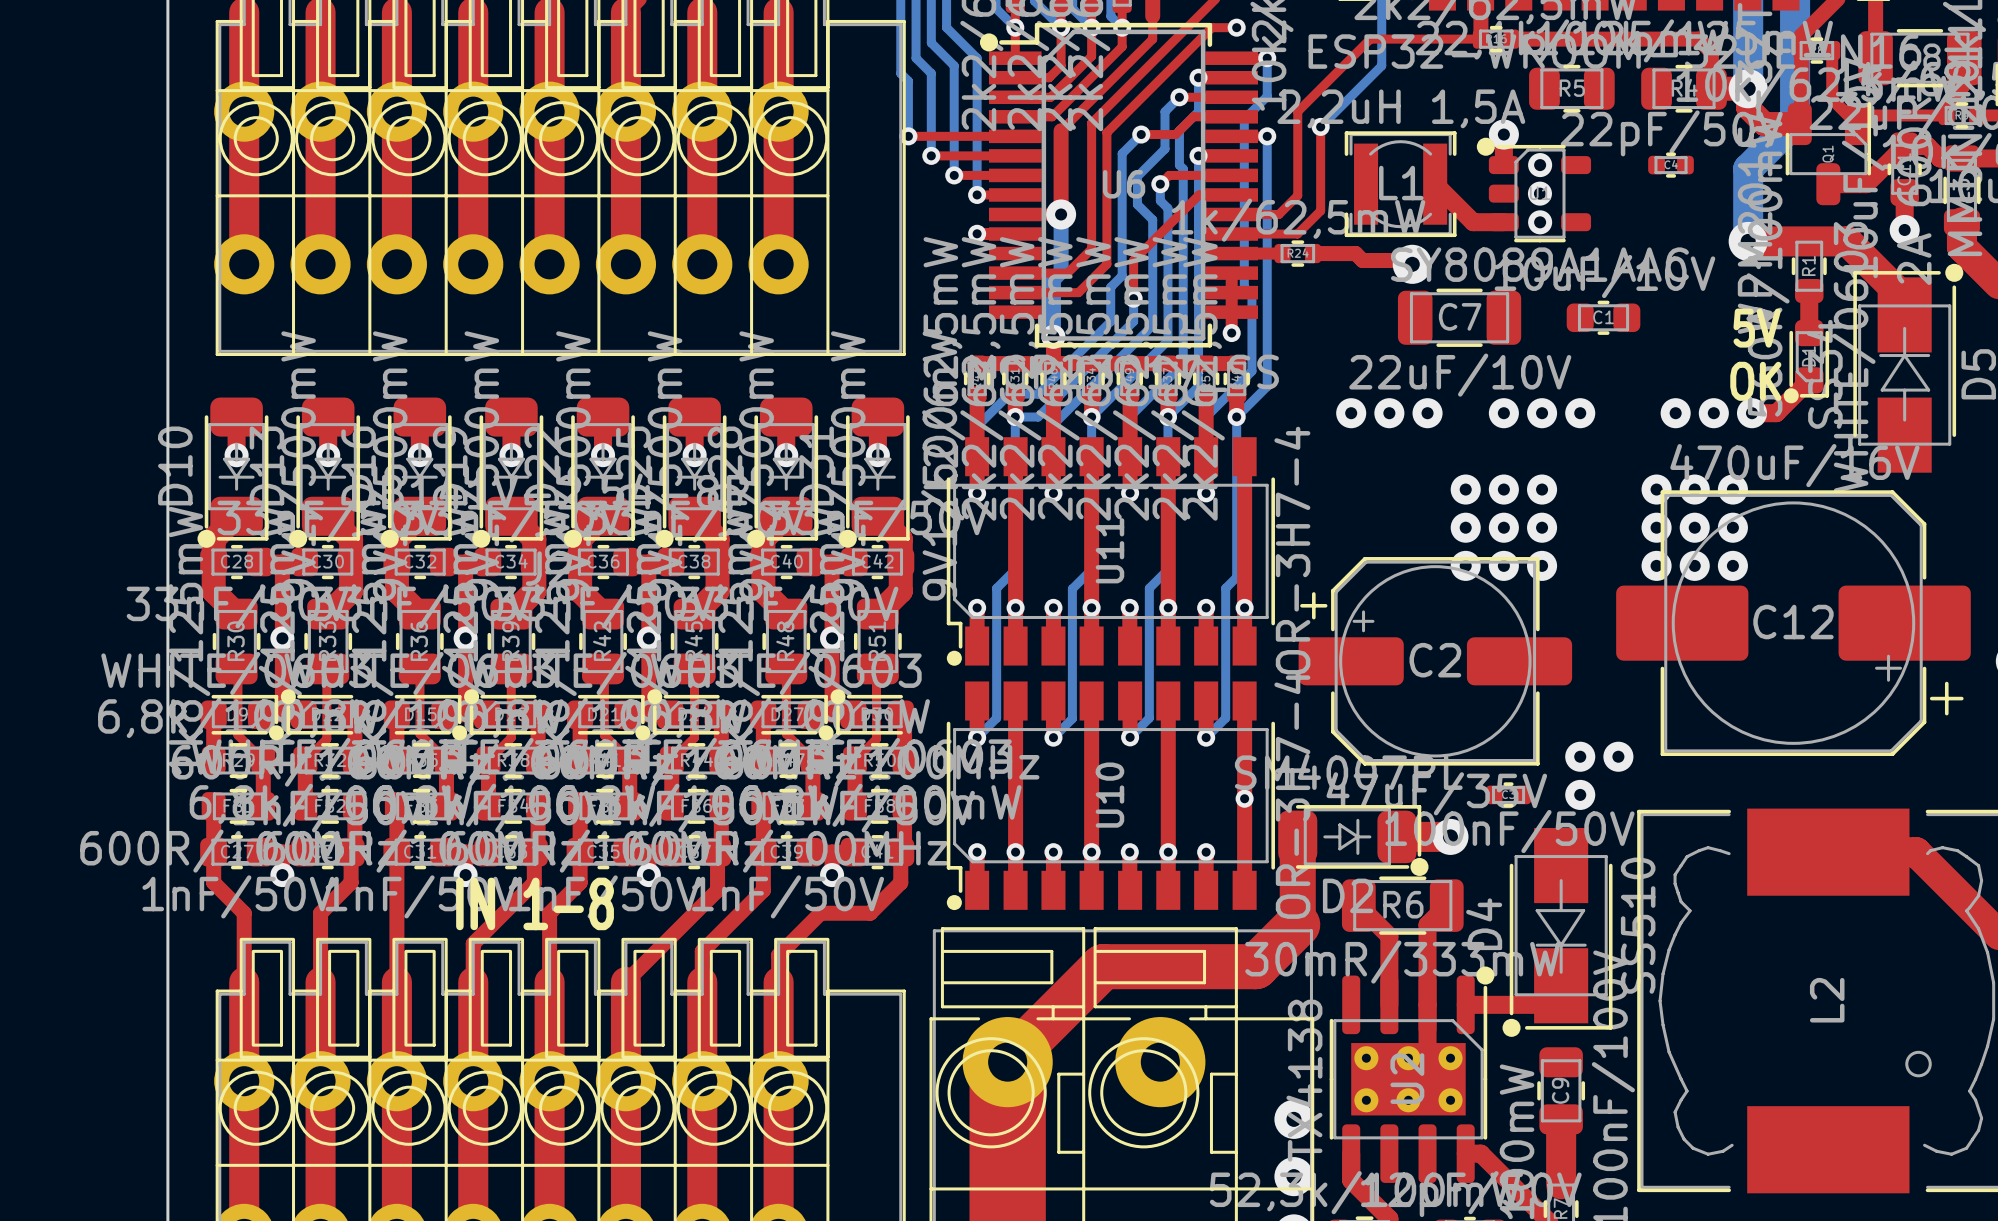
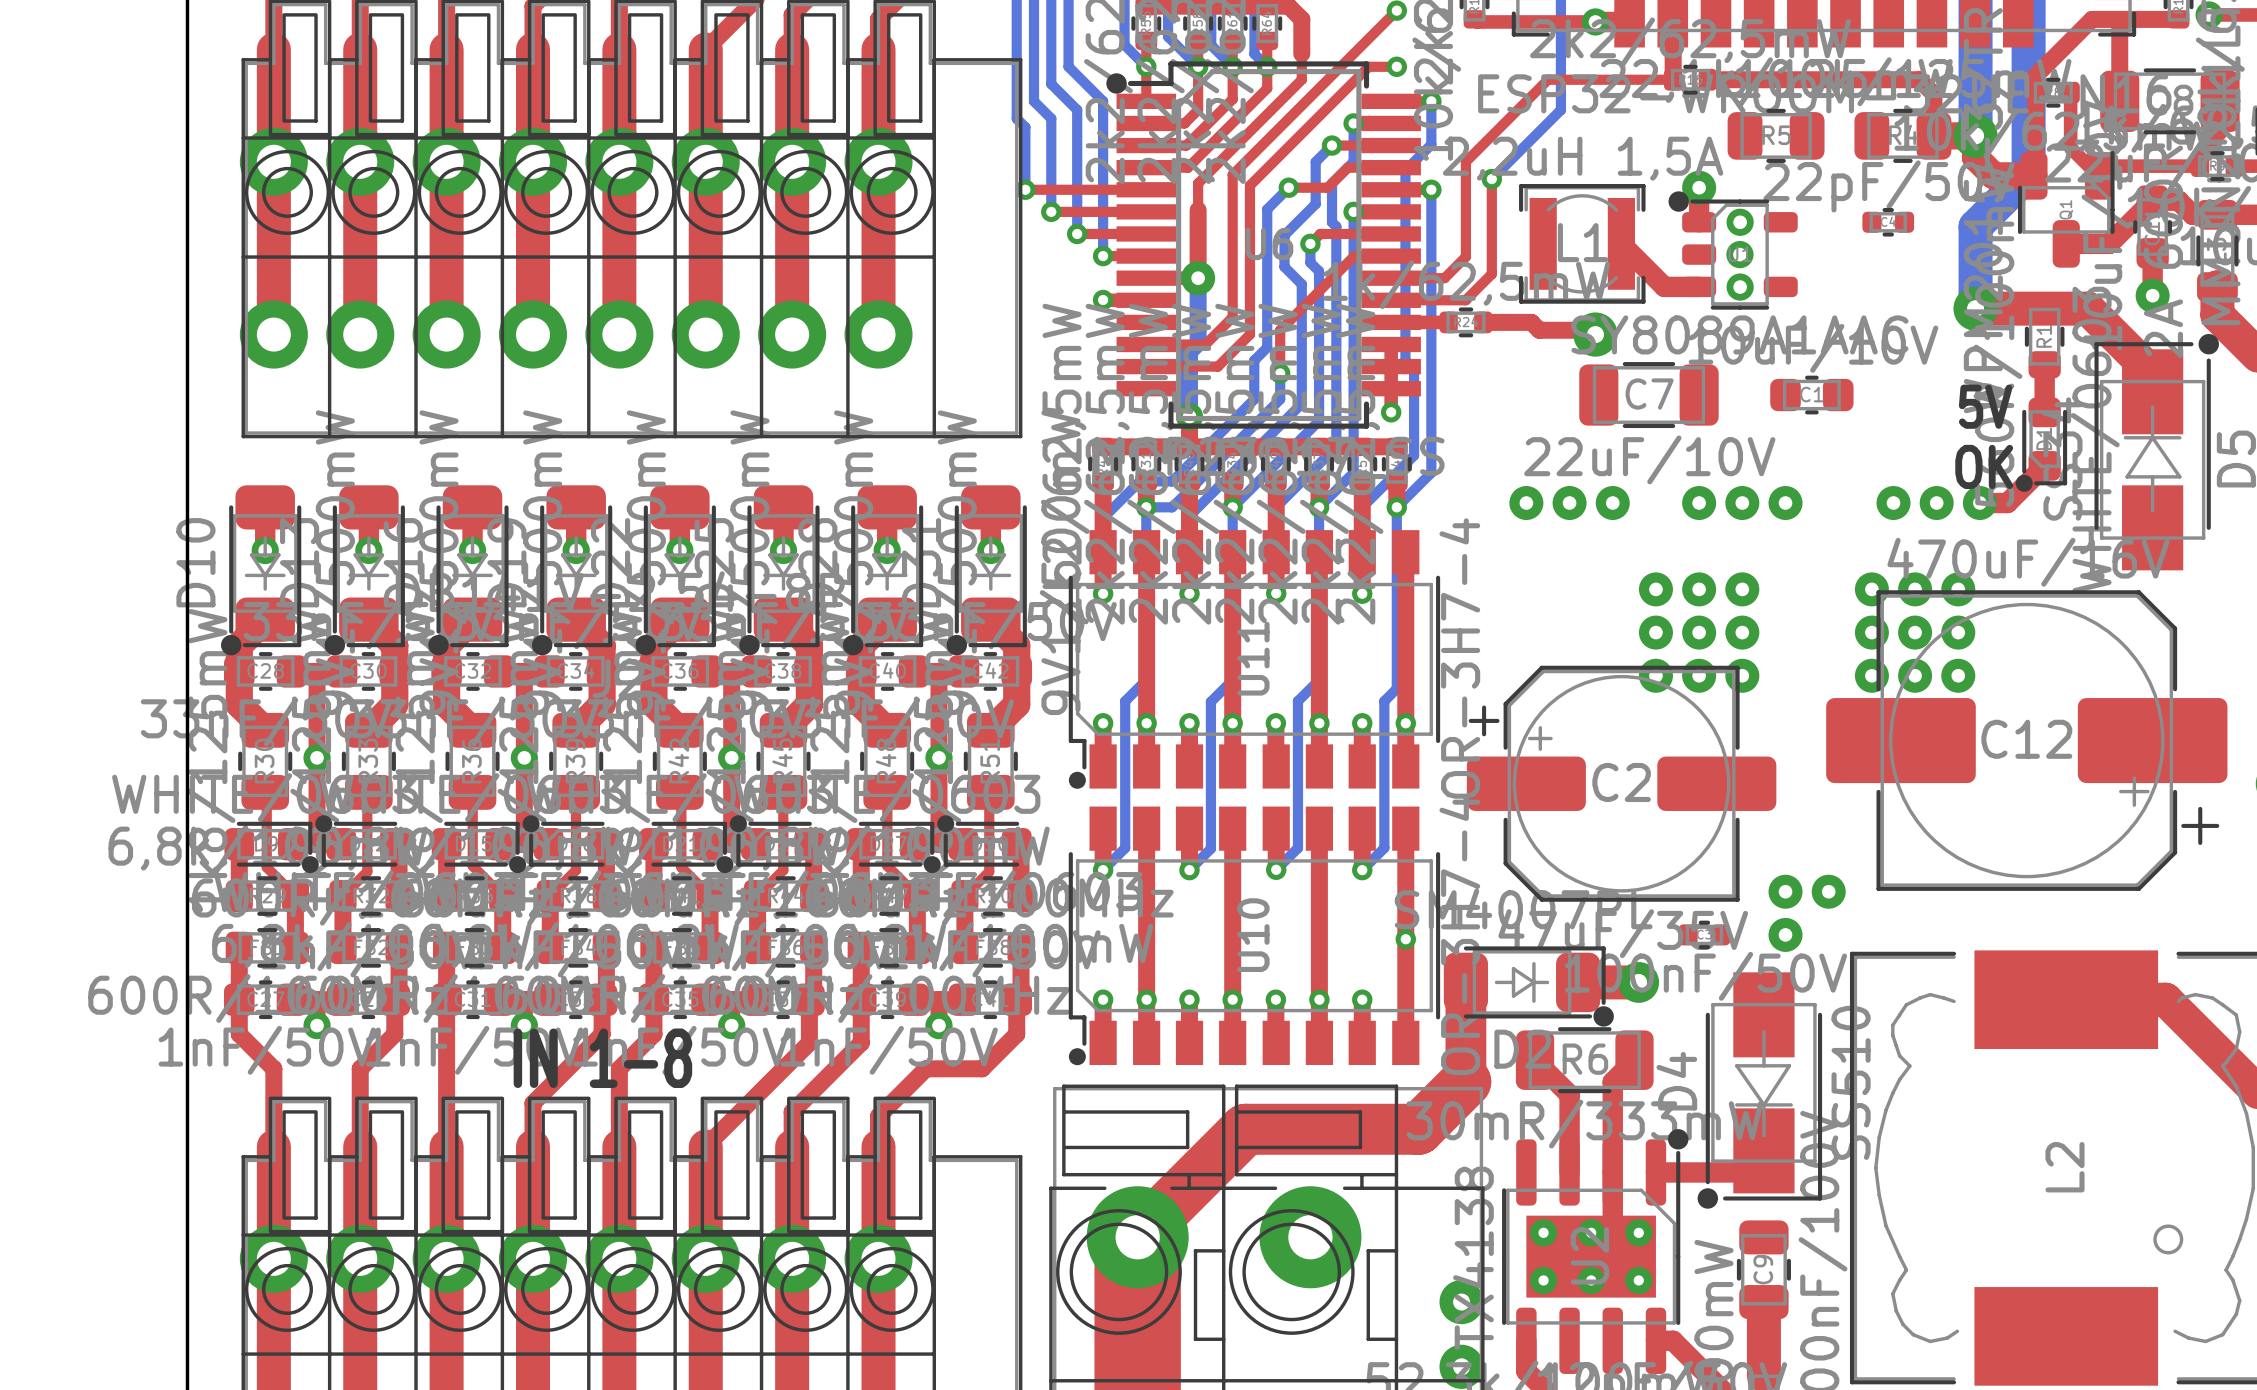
top track width: thick (1061, 130) (1061, 154) -> thin (1198, 183) (1198, 210)

